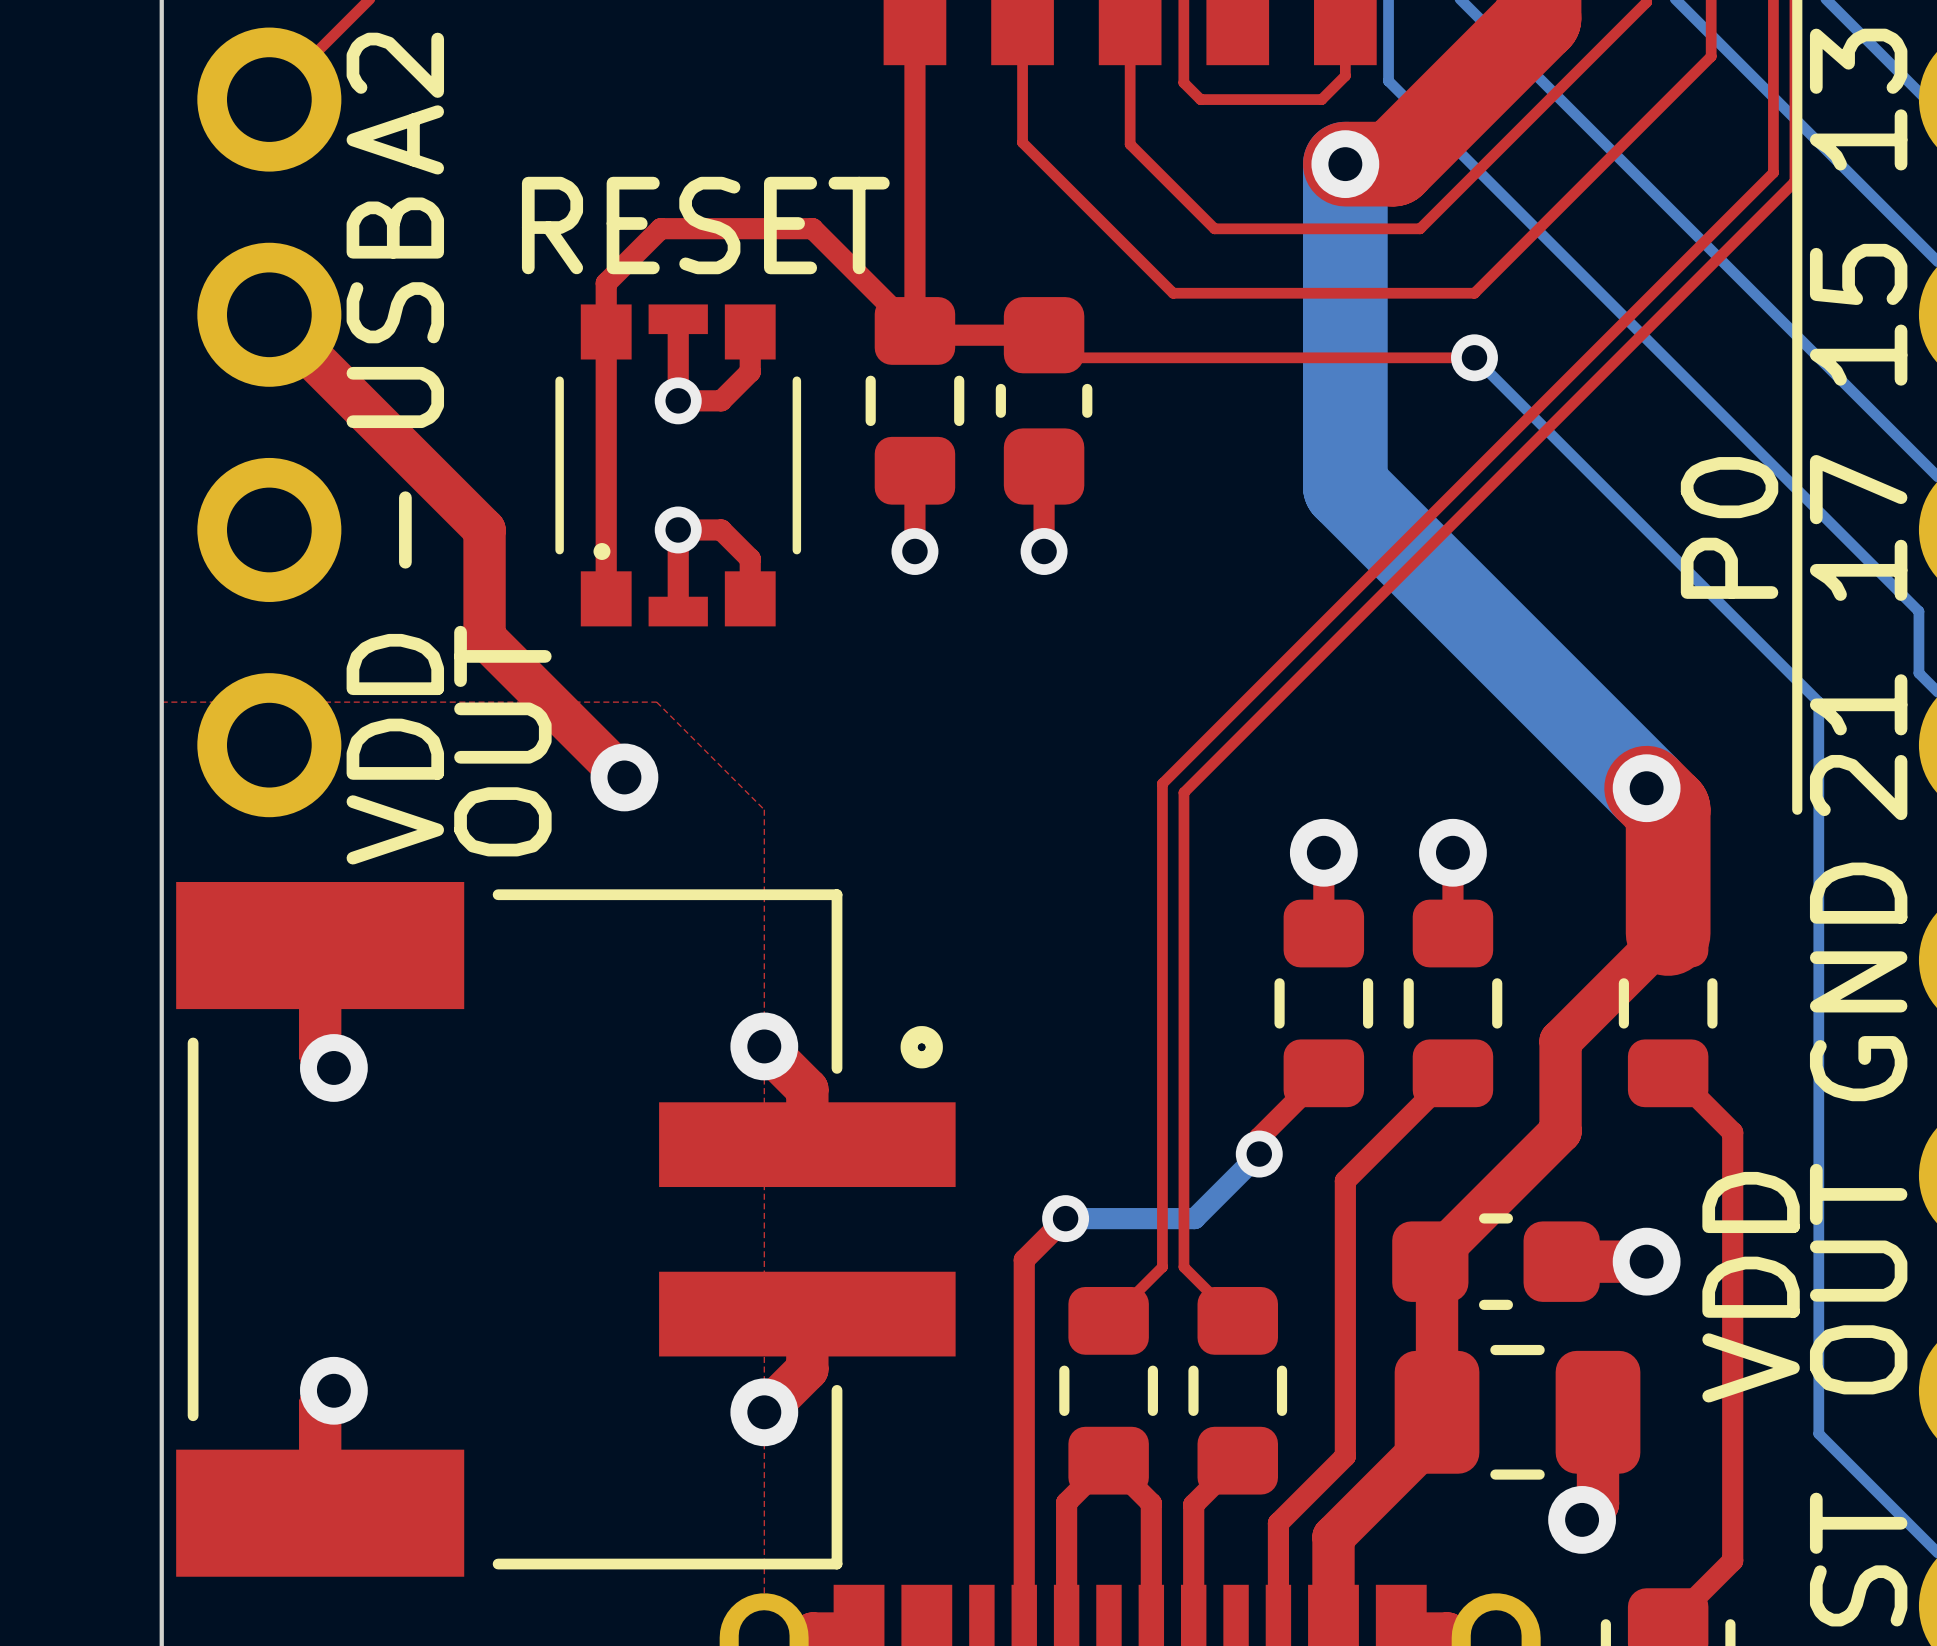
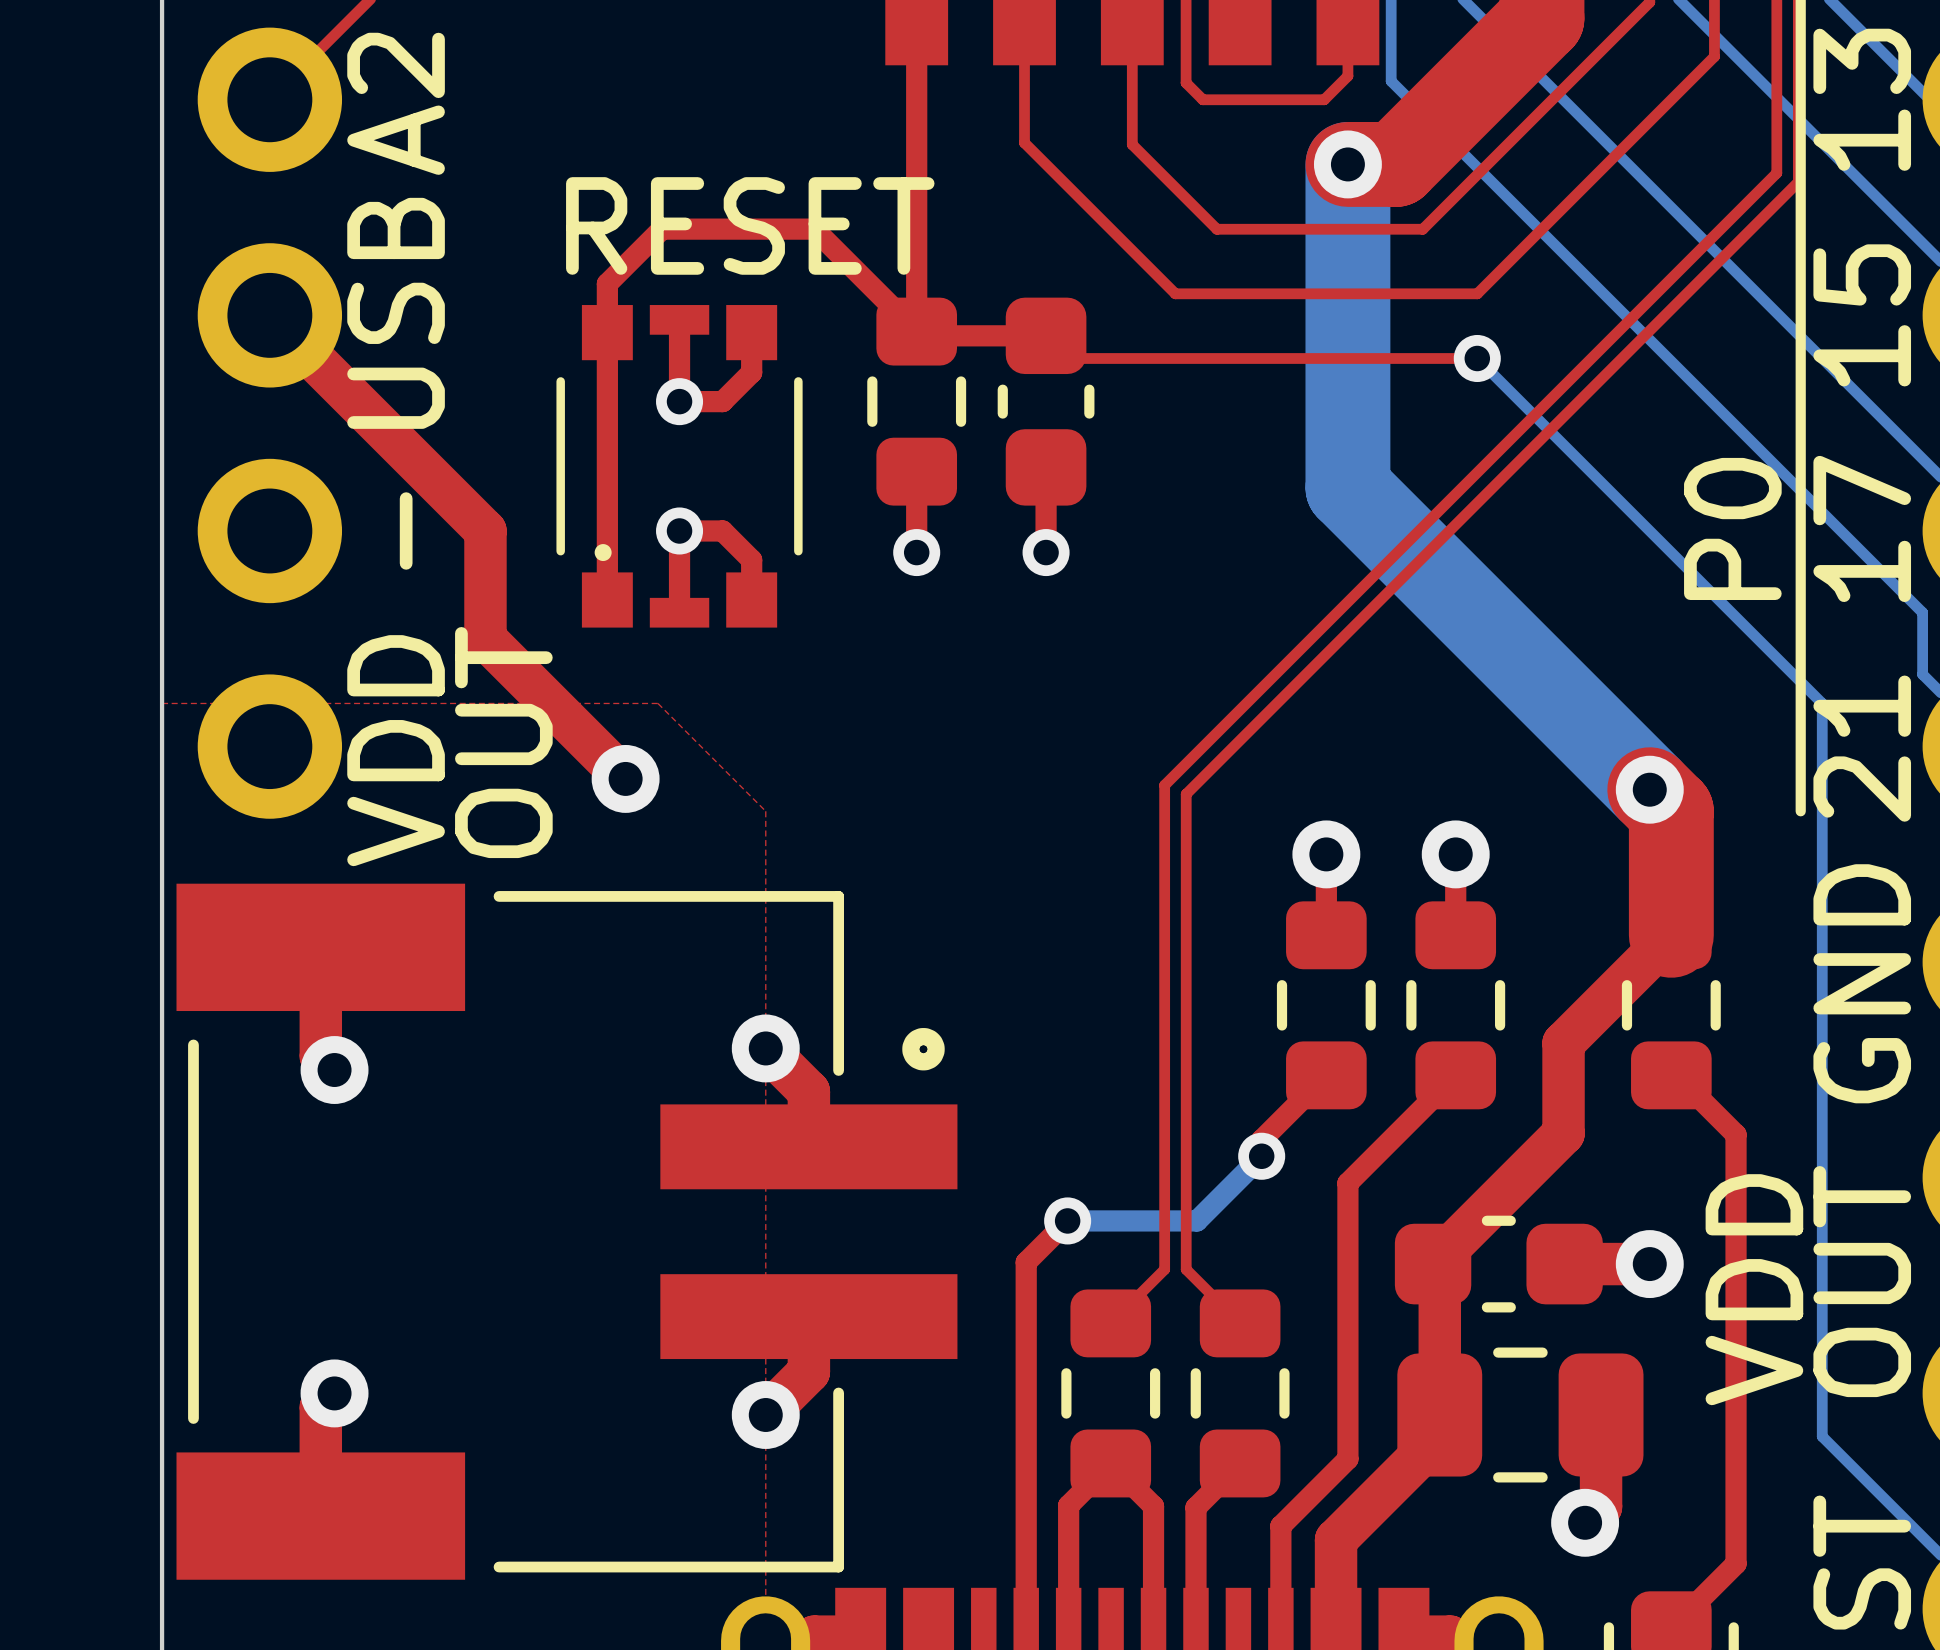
text position: RESET (705, 225) -> RESET (750, 225)

